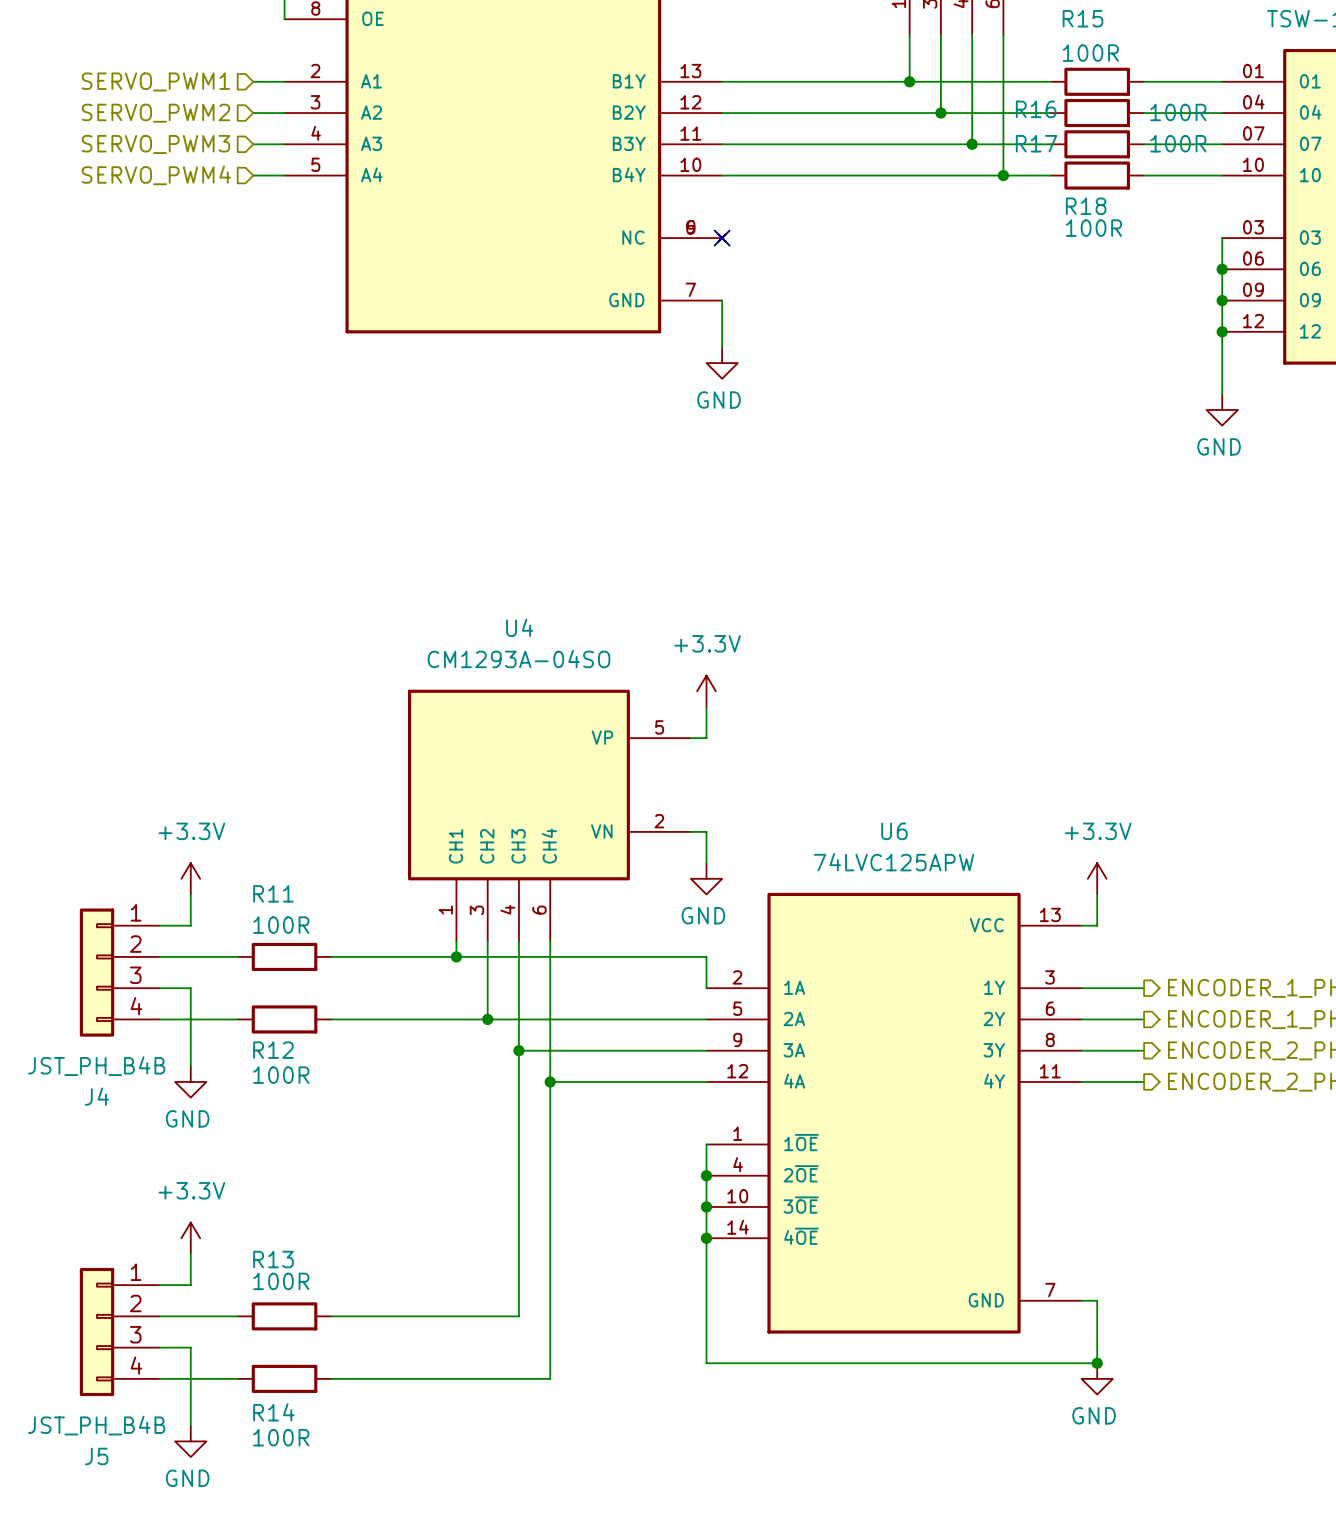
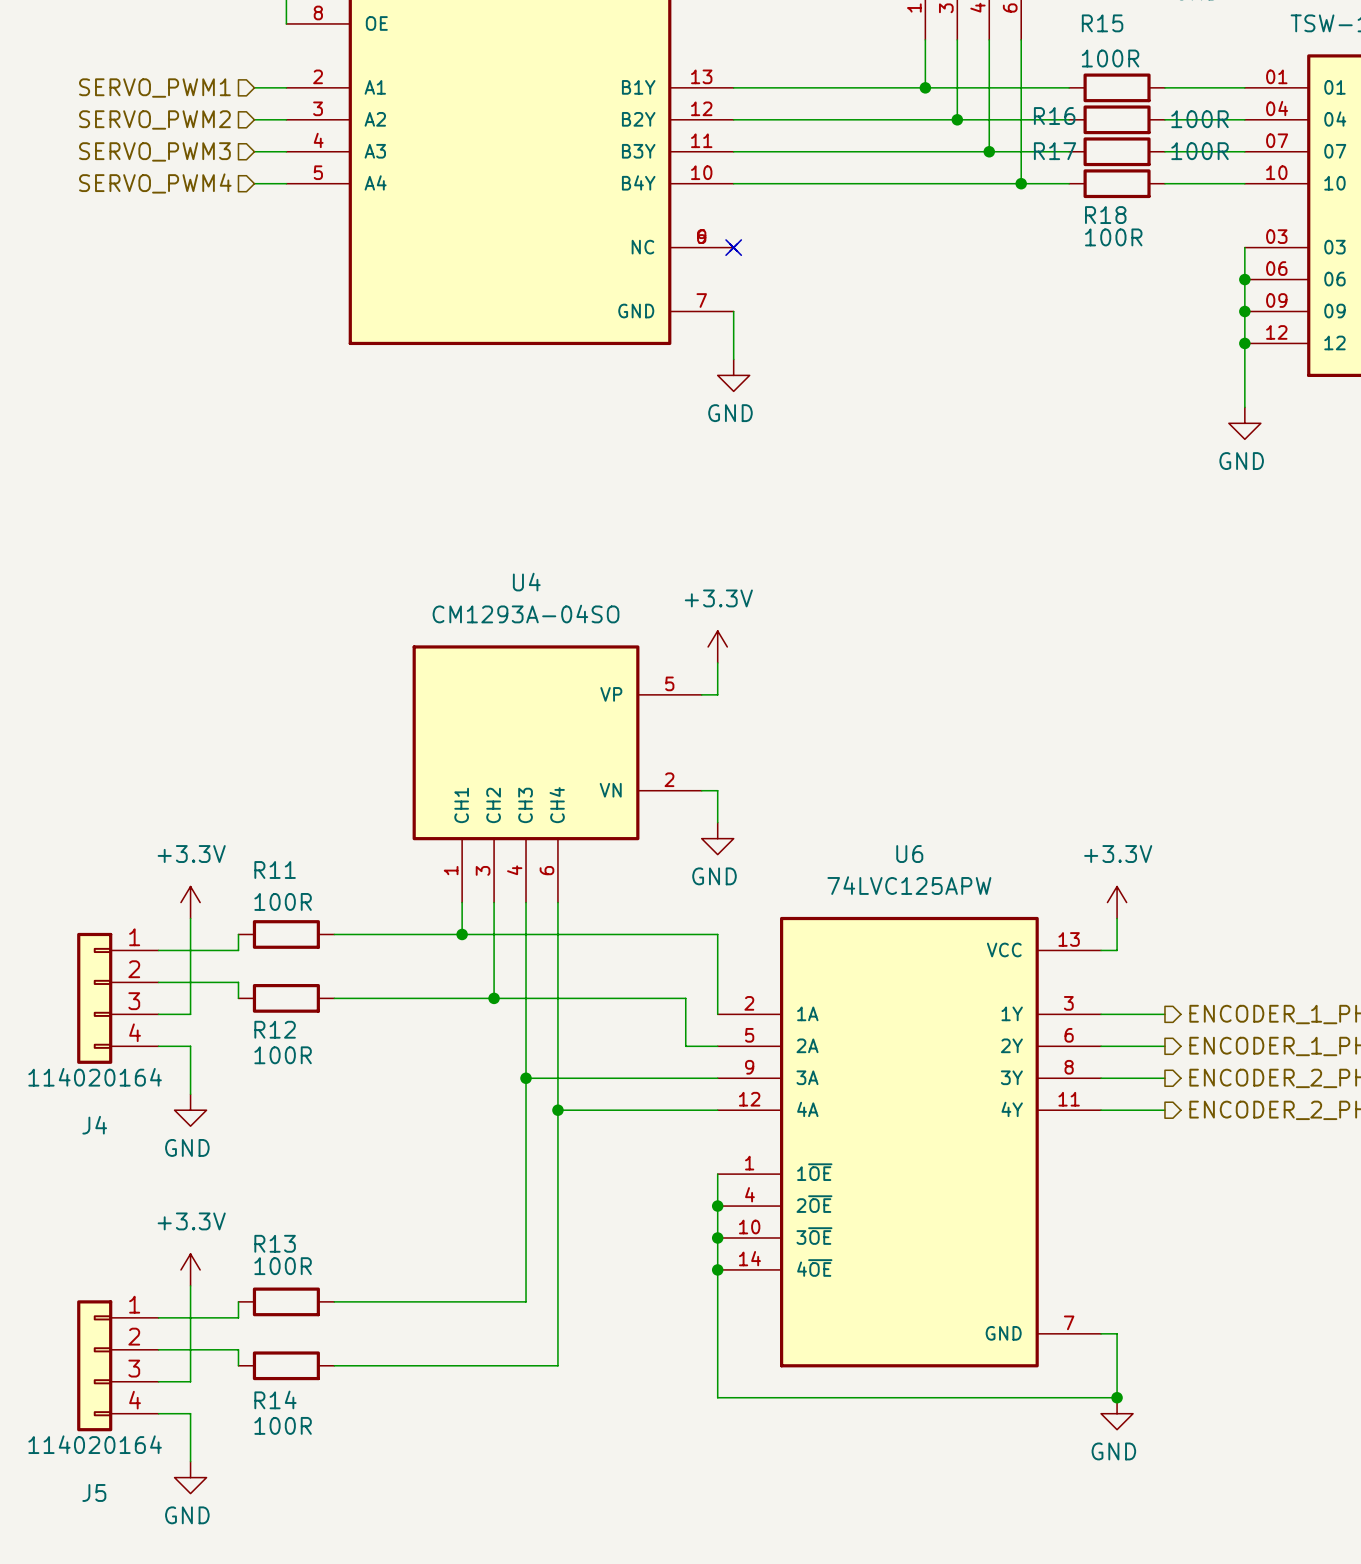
power symbol position: +3.3V (706, 691) -> +3.3V (717, 646)
wire: (706, 706) (706, 738) (690, 738) -> (717, 662) (717, 694) (701, 694)
U4 position: (549, 815) -> (557, 773)
wire: (690, 831) (706, 831) (706, 863) -> (701, 790) (717, 790) (717, 822)
power symbol position: GND (706, 878) -> GND (717, 838)
junction: none -> (462, 934)
wire: (456, 941) (456, 956) -> (238, 982) (238, 998)
R11 position: (284, 956) -> (286, 934)
wire: (331, 956) (706, 956) -> (334, 934) (717, 934) (717, 982)
junction: (456, 956) -> none
wire: (487, 972) (487, 1019) -> none
junction: none -> (494, 998)
wire: (190, 988) (190, 1019) (237, 1019) -> (190, 1014) (190, 950) (238, 950) (238, 934)
R12 position: (284, 1019) -> (286, 998)
wire: (331, 1019) (675, 1019) -> (334, 998) (685, 998) (685, 1046)
junction: (487, 1019) -> none
J4 value: JST_PH_B4B (96, 1066) -> 114020164 (95, 1077)
wire: (518, 1269) (518, 1316) (331, 1316) -> (526, 1301) (334, 1301)
wire: none -> (238, 1349) (238, 1365)
R13 position: (284, 1316) -> (286, 1301)
wire: (550, 1332) (550, 1378) (331, 1378) -> (557, 1365) (334, 1365)
wire: (190, 1347) (190, 1378) (237, 1378) -> (190, 1381) (190, 1317) (238, 1317) (238, 1301)
R14 position: (284, 1378) -> (286, 1365)
J5 value: JST_PH_B4B (96, 1425) -> 114020164 (95, 1444)

